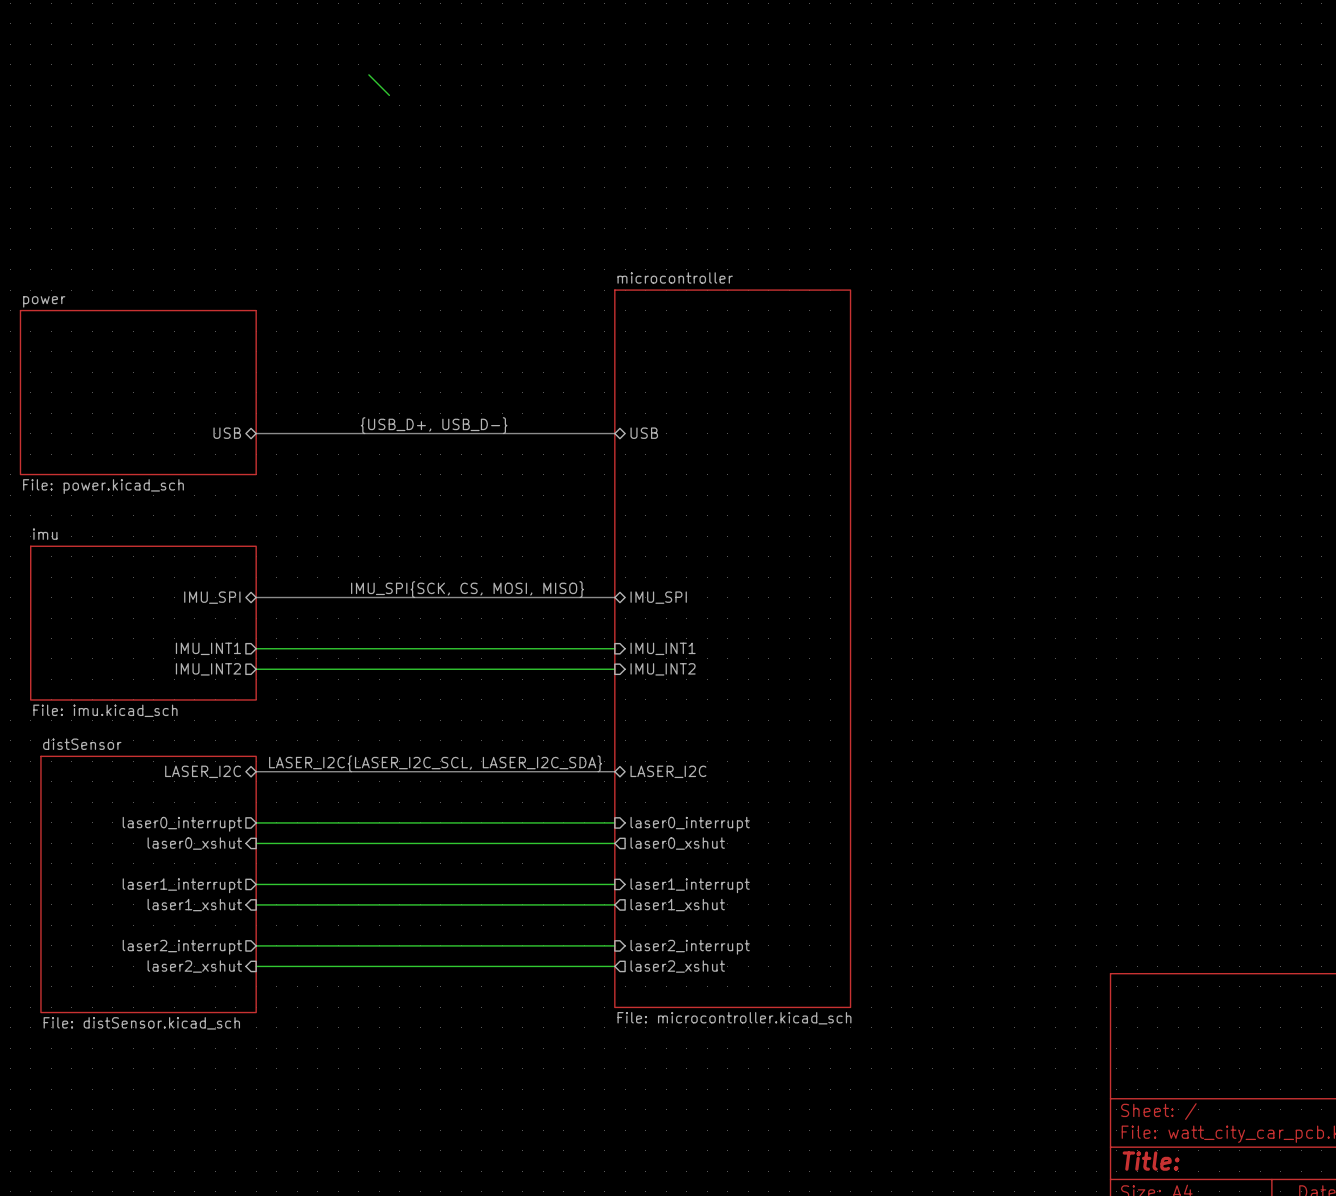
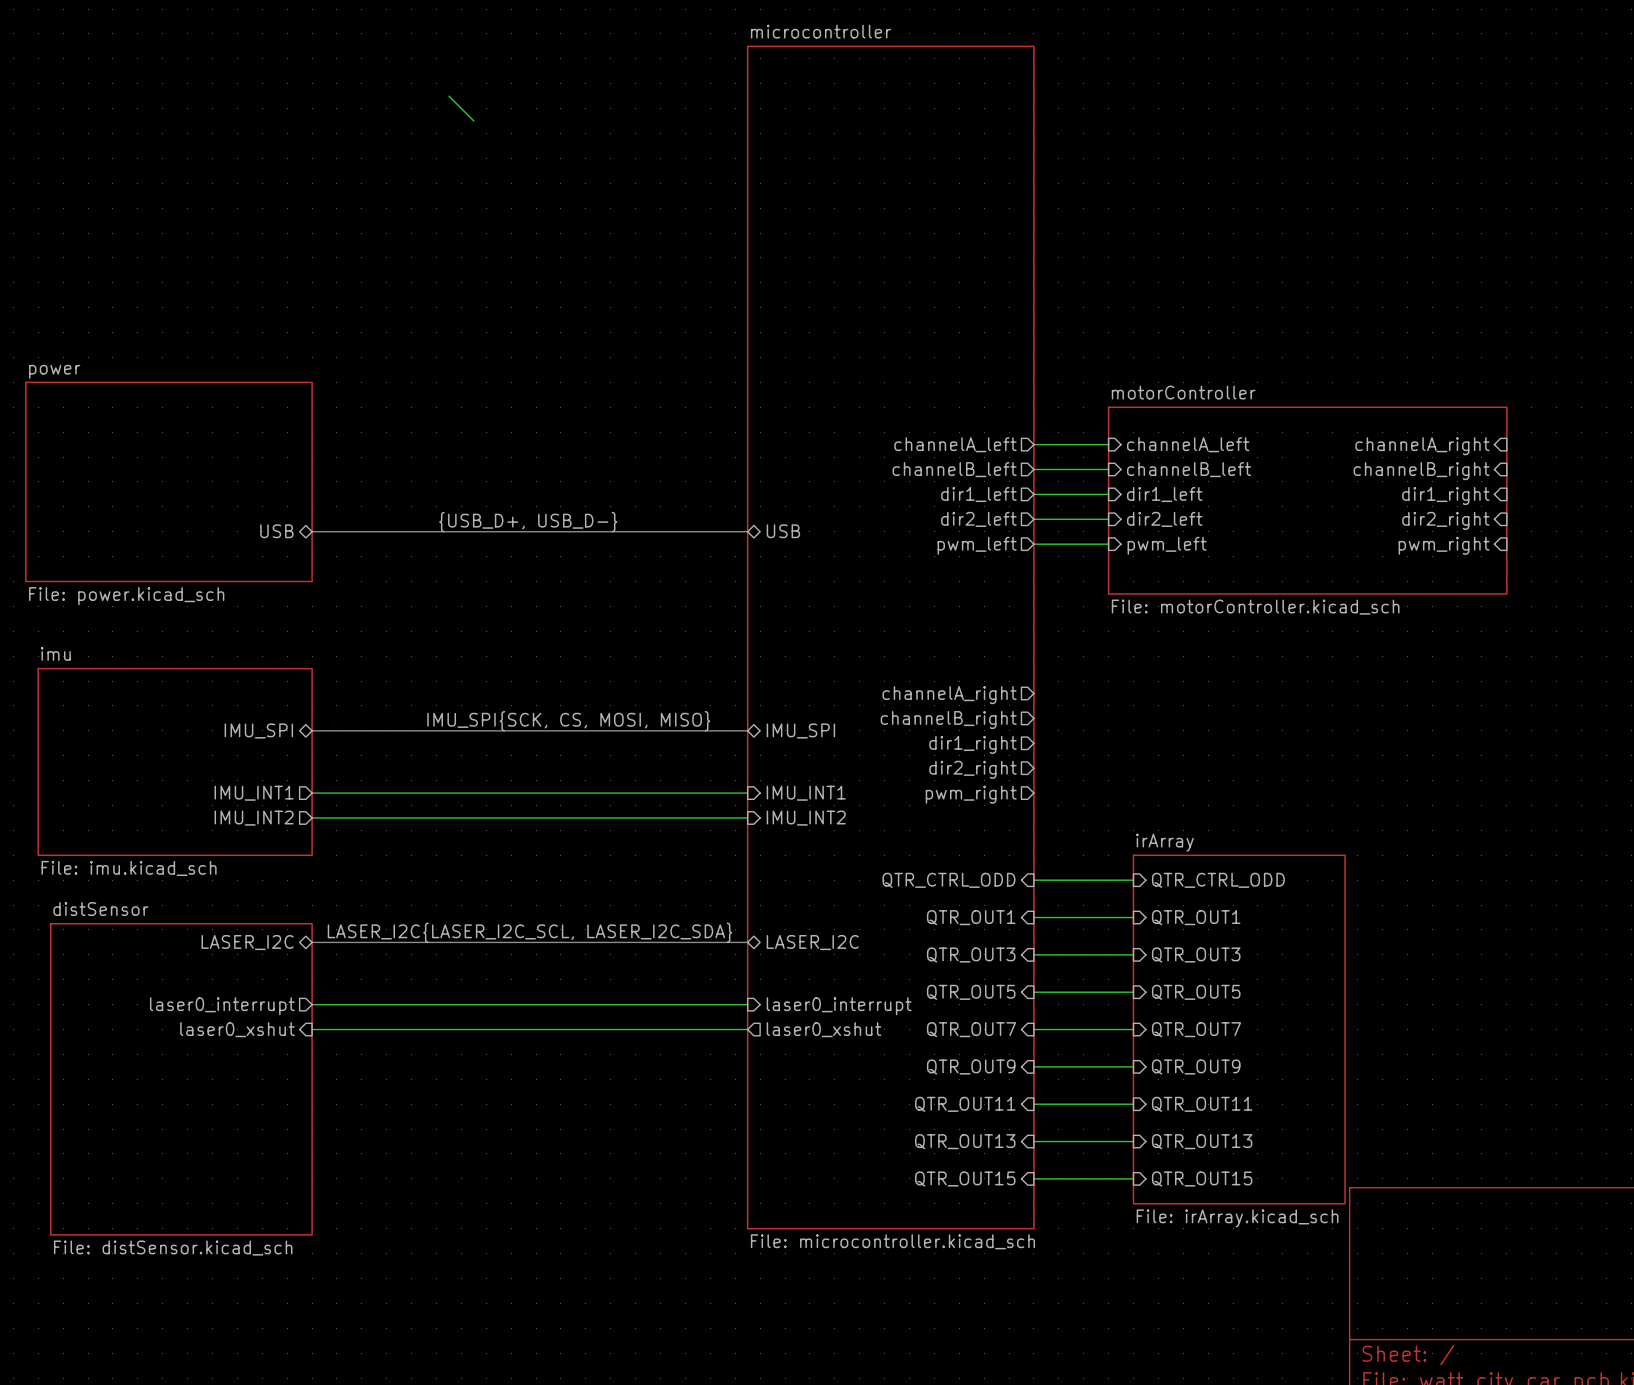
sheet pin: none -> channelA_left (955, 444)
wire: none -> (1033, 444) (1108, 444)
sheet pin: none -> channelA_left (1188, 444)
sheet pin: none -> channelA_right (1422, 446)
sheet pin: none -> channelB_left (954, 469)
wire: none -> (1033, 469) (1108, 469)
sheet pin: none -> channelB_left (1189, 469)
sheet pin: none -> channelB_right (1421, 471)
sheet pin: none -> dir1_left (978, 494)
wire: none -> (1033, 494) (1108, 494)
sheet pin: none -> dir1_left (1164, 494)
sheet pin: none -> dir1_right (1445, 496)
sheet motorController: none -> File: motorController.kicad_sch (1307, 500)
sheet pin: none -> dir2_left (978, 519)
wire: none -> (1033, 519) (1108, 519)
sheet pin: none -> dir2_left (1164, 519)
sheet pin: none -> dir2_right (1445, 520)
wire: none -> (1033, 544) (1108, 544)
sheet pin: none -> pwm_left (977, 545)
sheet pin: none -> pwm_left (1167, 545)
sheet pin: none -> pwm_right (1444, 545)
sheet microcontroller: none -> File: microcontroller.kicad_sch (890, 637)
sheet pin: none -> channelA_right (949, 695)
sheet pin: none -> channelB_right (948, 720)
sheet pin: none -> dir1_right (972, 744)
sheet pin: none -> dir2_right (972, 769)
sheet microcontroller: File: microcontroller.kicad_sch (732, 648) -> none
sheet pin: none -> pwm_right (971, 794)
sheet pin: none -> QTR_CTRL_ODD (948, 880)
wire: none -> (1033, 880) (1133, 880)
sheet pin: none -> QTR_CTRL_ODD (1218, 880)
sheet pin: none -> QTR_OUT1 (971, 917)
wire: none -> (1033, 917) (1133, 917)
sheet pin: none -> QTR_OUT1 (1196, 917)
wire: none -> (1033, 954) (1133, 954)
sheet pin: none -> QTR_OUT3 (971, 954)
sheet pin: none -> QTR_OUT3 (1196, 954)
sheet pin: none -> QTR_OUT5 (971, 992)
wire: none -> (1033, 992) (1133, 992)
sheet pin: none -> QTR_OUT5 (1196, 992)
sheet pin: none -> QTR_OUT7 (971, 1029)
wire: none -> (1033, 1029) (1133, 1029)
sheet pin: none -> QTR_OUT7 (1196, 1029)
sheet irArray: none -> File: irArray.kicad_sch (1239, 1029)
sheet pin: none -> QTR_OUT9 (971, 1067)
wire: none -> (1033, 1066) (1133, 1066)
sheet pin: none -> QTR_OUT9 (1196, 1067)
wire: (256, 884) (614, 884) -> none
sheet pin: laser1_interrupt (182, 885) -> none
sheet pin: laser1_interrupt (690, 885) -> none
wire: (256, 904) (614, 904) -> none
wire: none -> (1033, 1104) (1133, 1104)
sheet pin: laser1_xshut (194, 905) -> none
sheet pin: laser1_xshut (677, 905) -> none
sheet pin: none -> QTR_OUT11 (965, 1104)
sheet pin: none -> QTR_OUT11 (1202, 1104)
sheet pin: none -> QTR_OUT13 (965, 1141)
wire: none -> (1033, 1141) (1133, 1141)
sheet pin: none -> QTR_OUT13 (1202, 1141)
wire: (256, 945) (614, 945) -> none
sheet pin: laser2_interrupt (182, 947) -> none
sheet pin: laser2_interrupt (690, 947) -> none
sheet pin: laser2_xshut (194, 966) -> none
wire: (256, 966) (614, 966) -> none
sheet pin: laser2_xshut (677, 966) -> none
sheet pin: none -> QTR_OUT15 (965, 1179)
wire: none -> (1033, 1178) (1133, 1178)
sheet pin: none -> QTR_OUT15 (1202, 1179)

